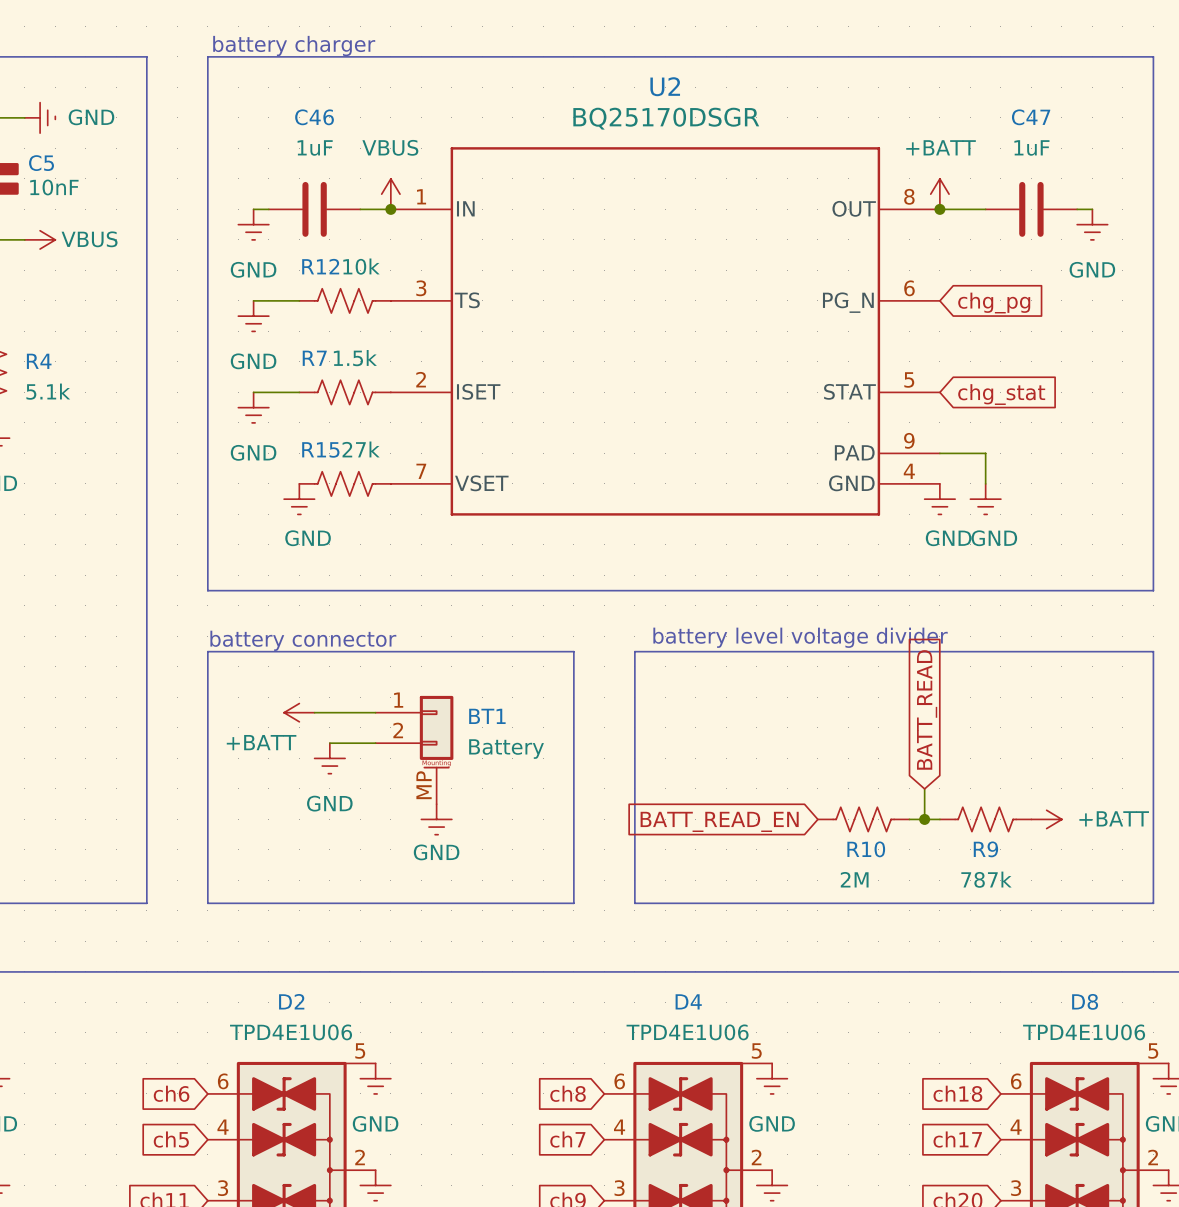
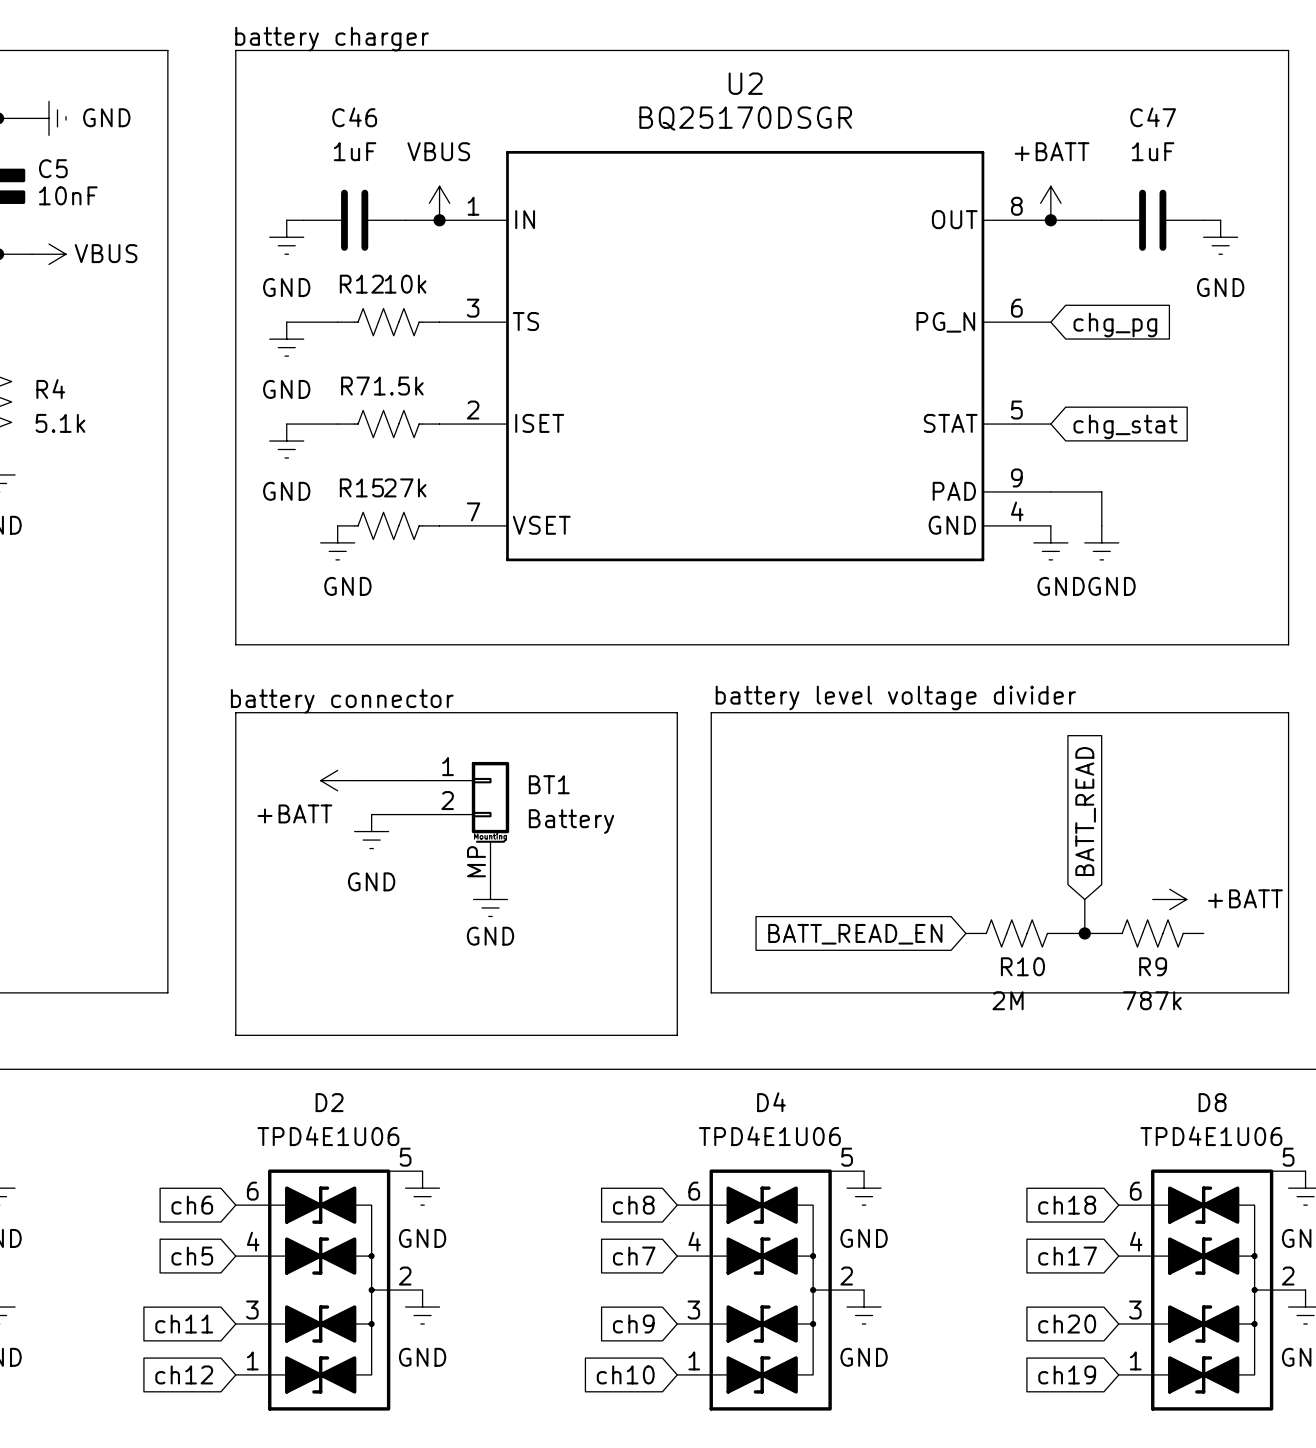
line: (573, 651) (573, 903) (207, 903) -> (643, 712) (677, 712) (677, 1035) (235, 1035) (235, 992)
global label position: BATT_READ (927, 709) -> BATT_READ (1085, 811)
wire: (924, 788) (924, 819) -> (1084, 899) (1084, 933)
R10 position: (863, 819) -> (1016, 933)
wire: (909, 819) (939, 819) -> (1067, 933) (1101, 933)
junction position: (924, 819) -> (1084, 933)
R9 position: (985, 819) -> (1152, 933)
global label position: BATT_READ_EN (719, 821) -> BATT_READ_EN (855, 934)

